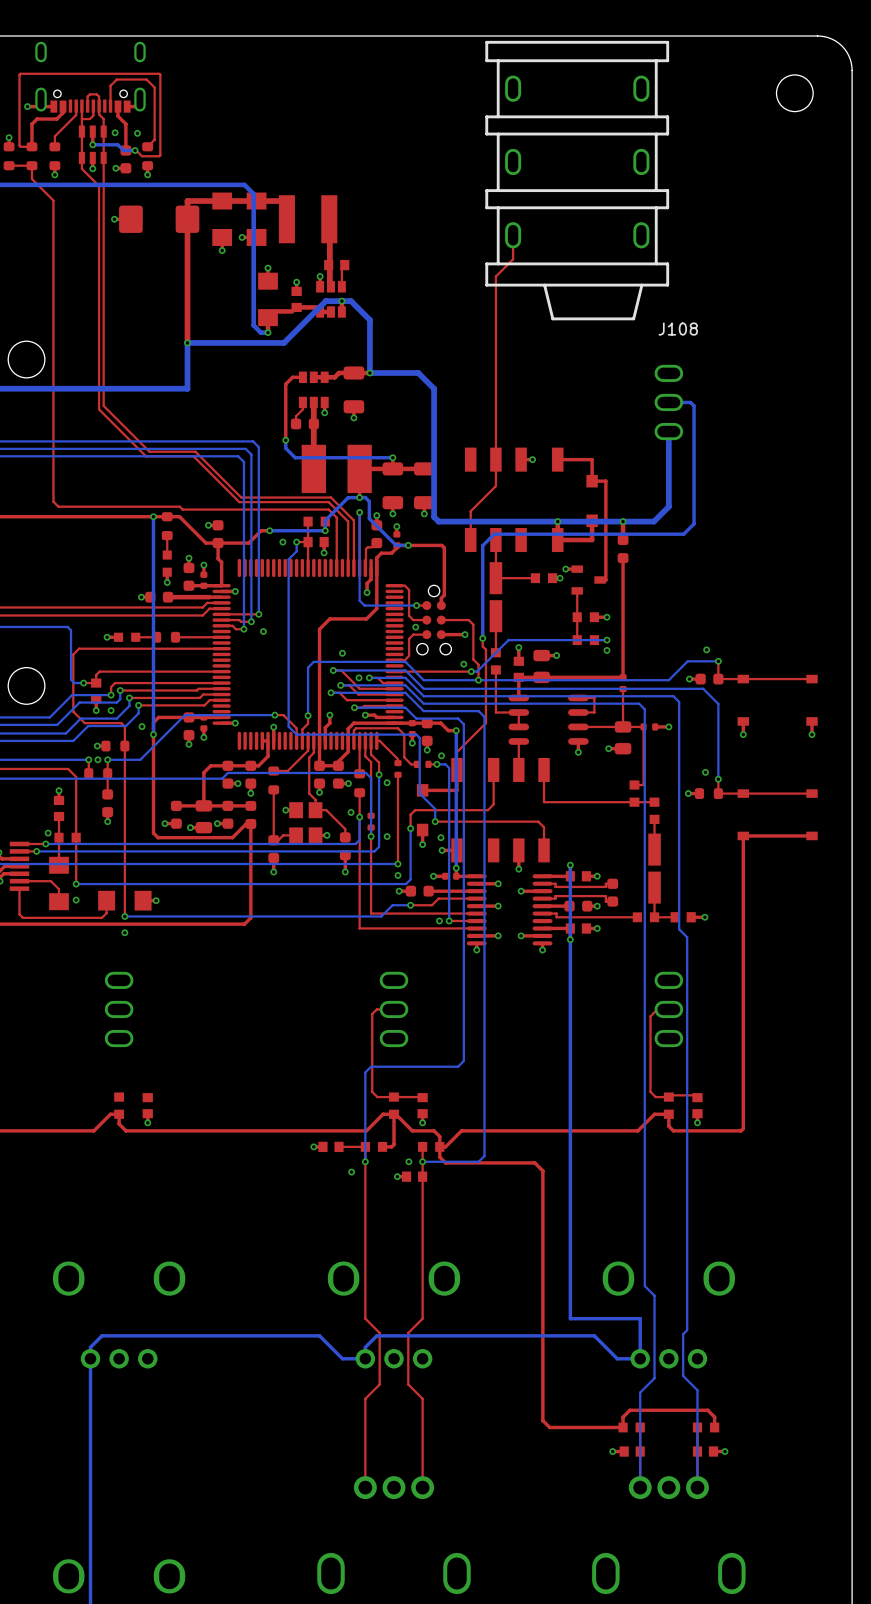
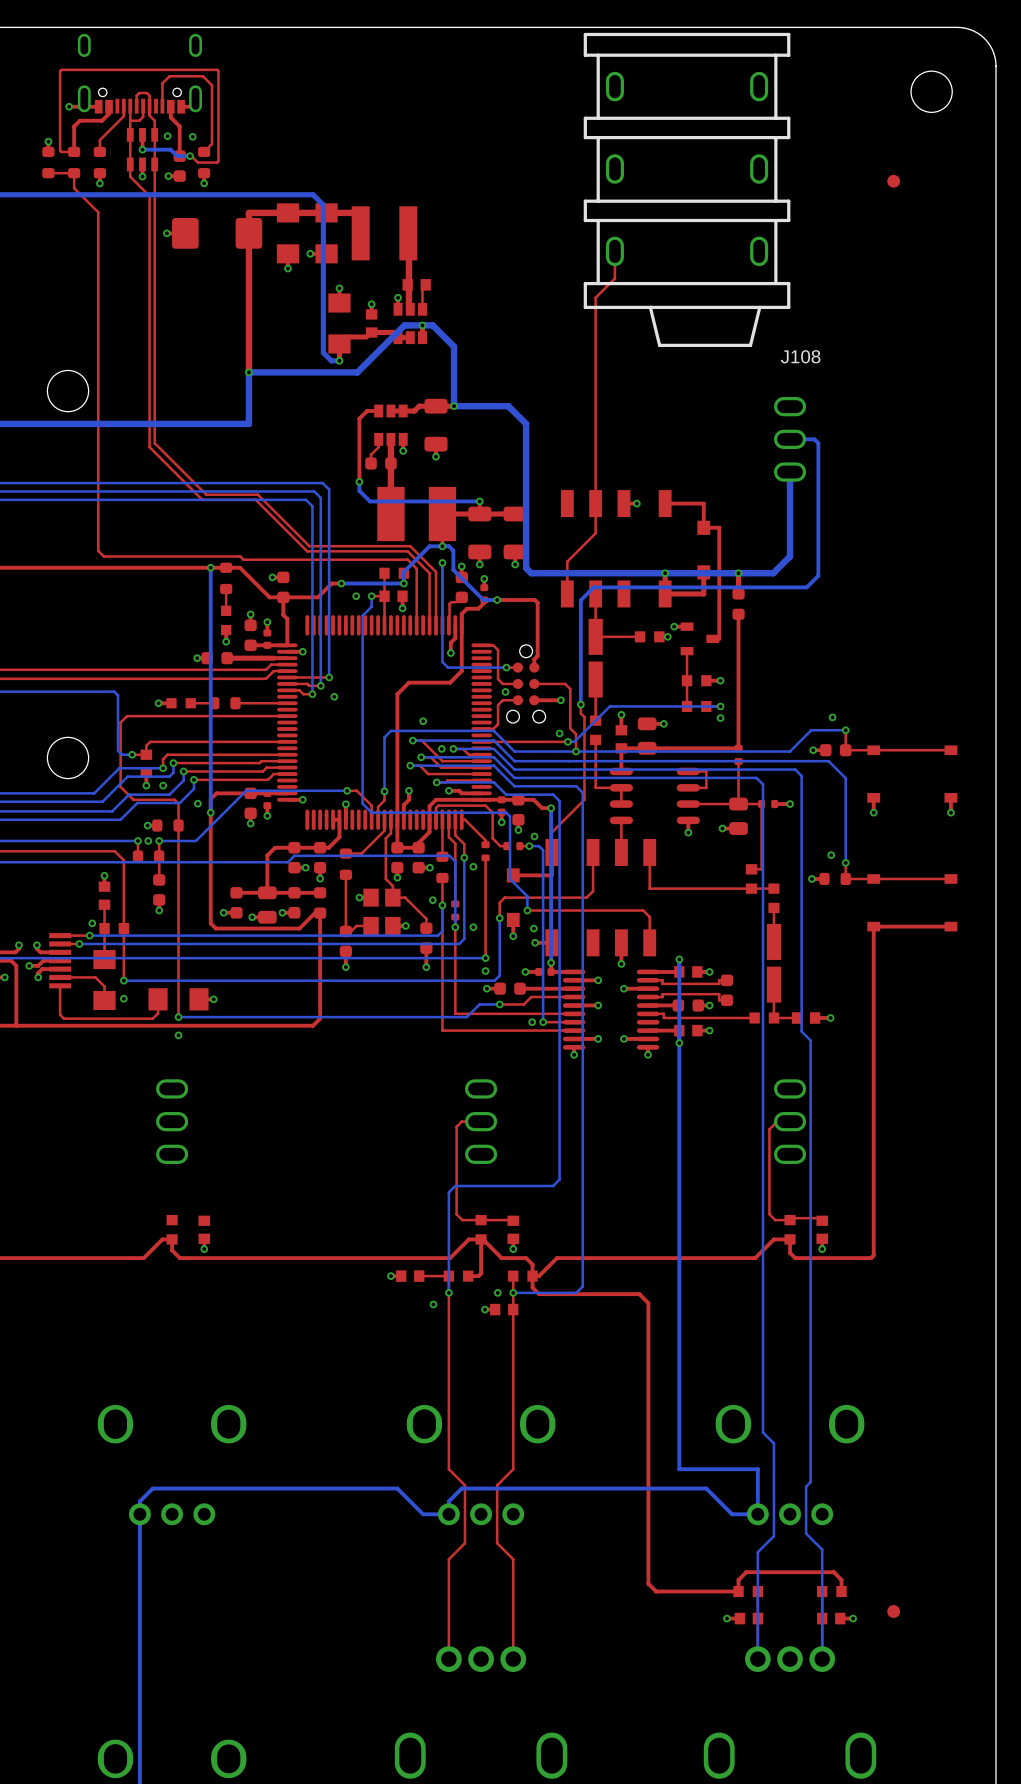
part: none -> (893, 181)
part: none -> (893, 1611)

